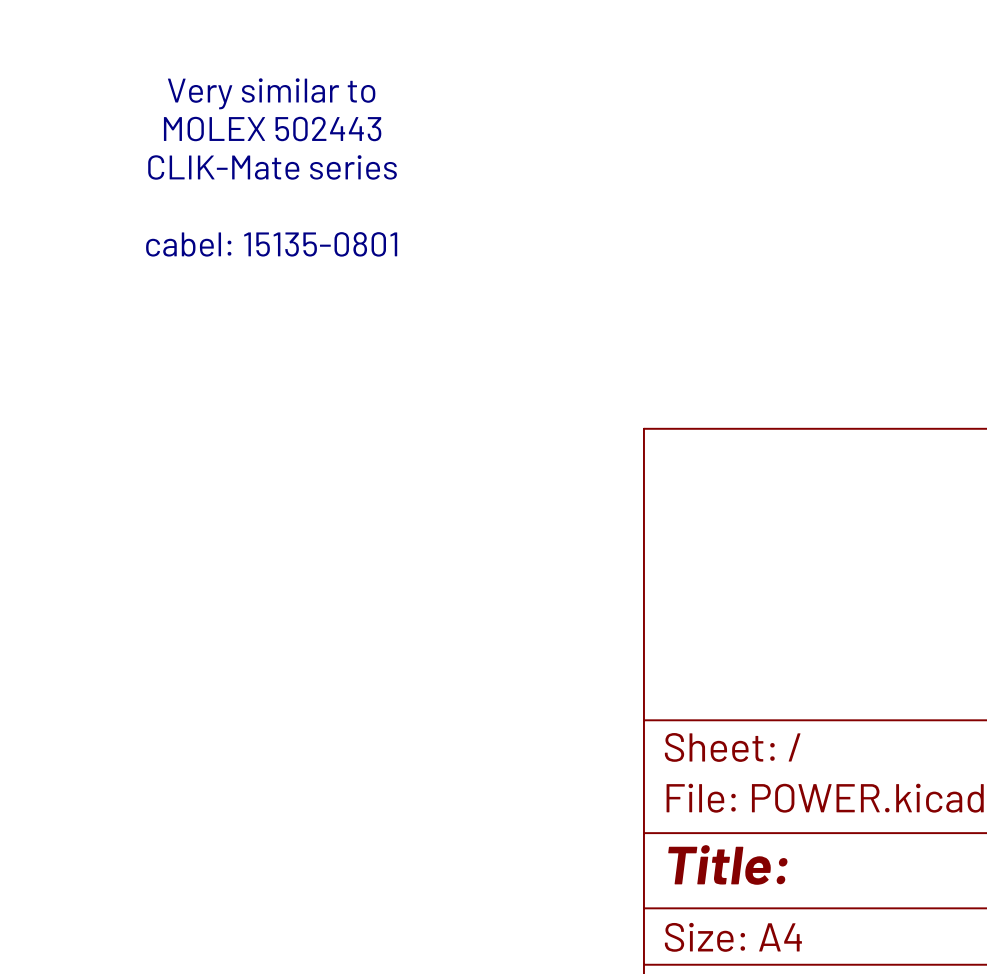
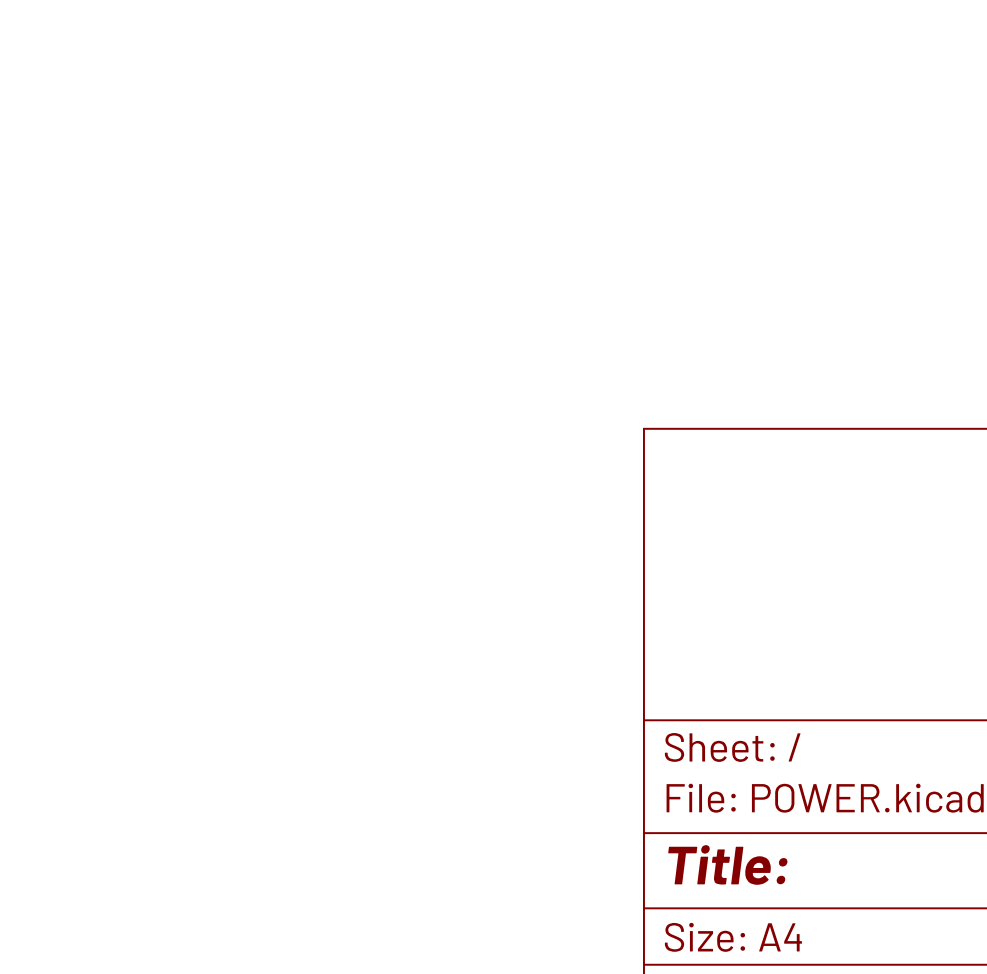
text: Very similar to (271, 93) -> none
text: MOLEX 502443 (272, 129) -> none
text: CLIK-Mate series (272, 167) -> none
text: cabel: 15135-0801 (271, 244) -> none

